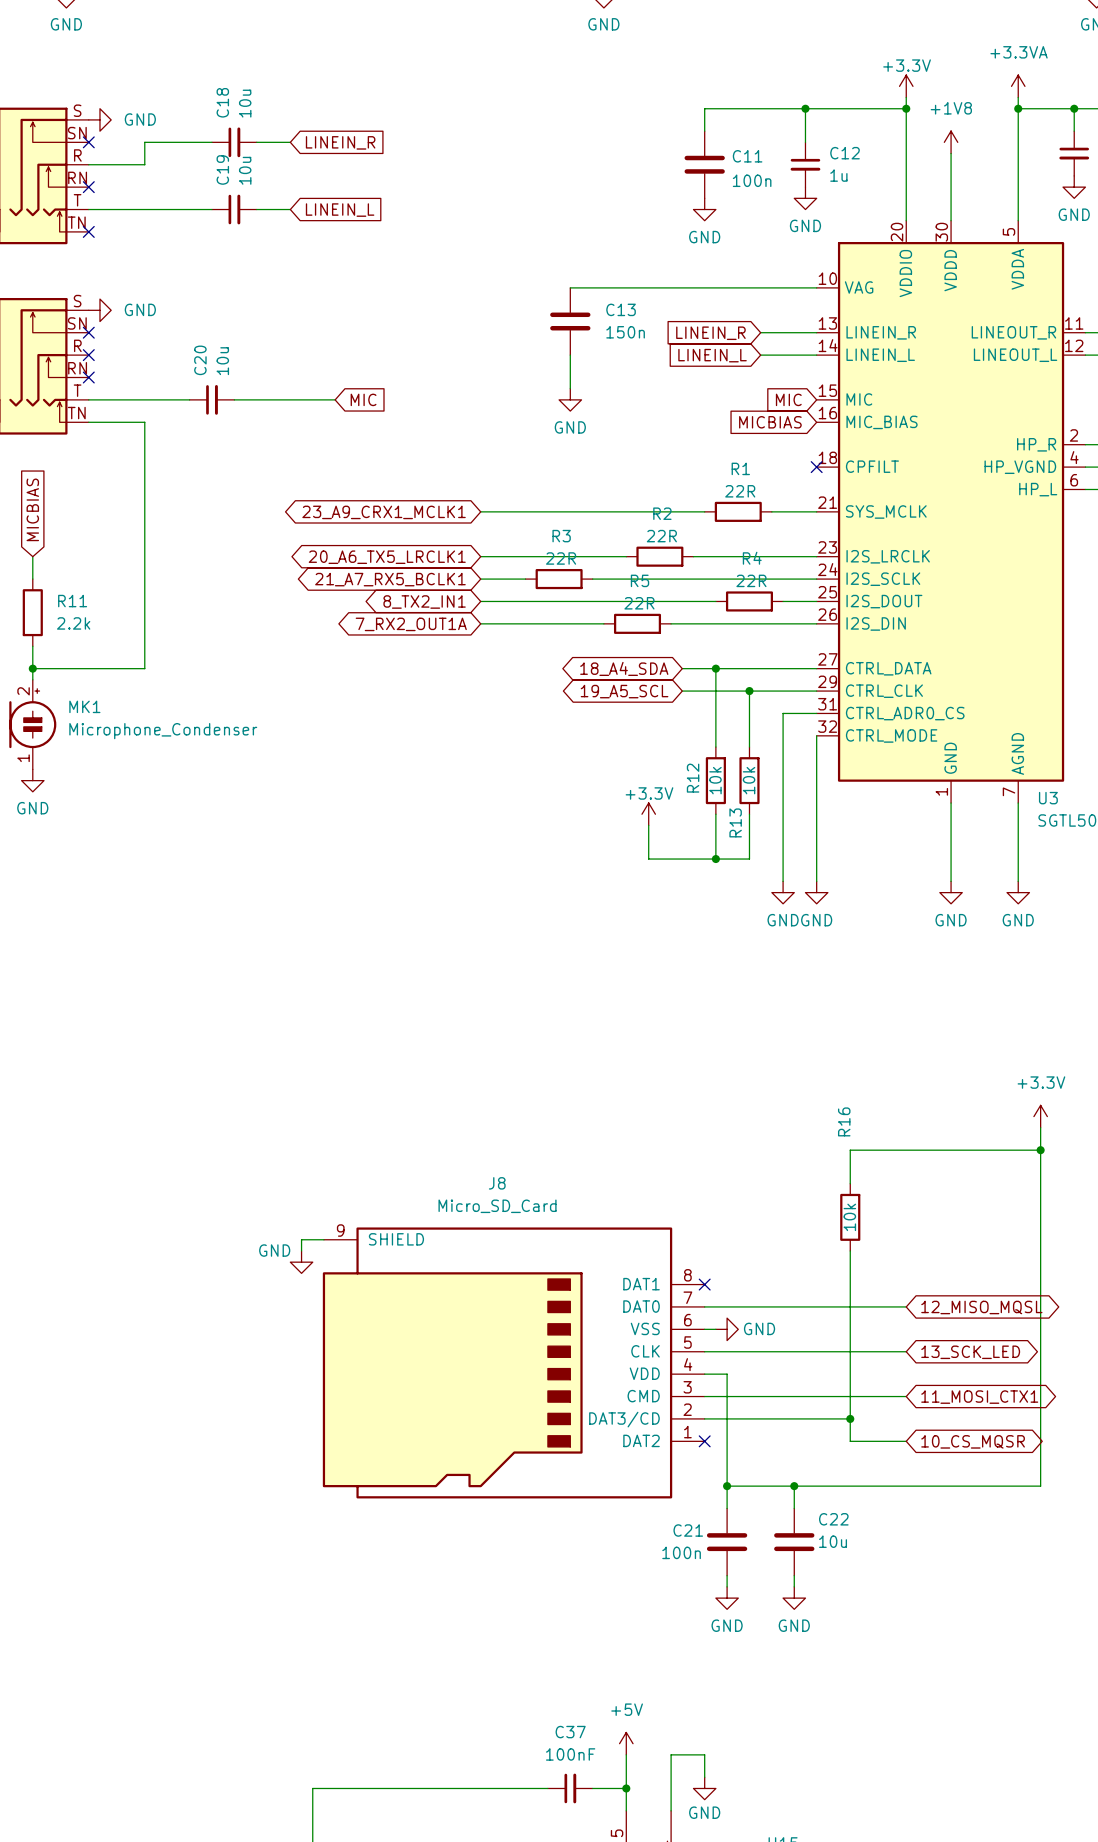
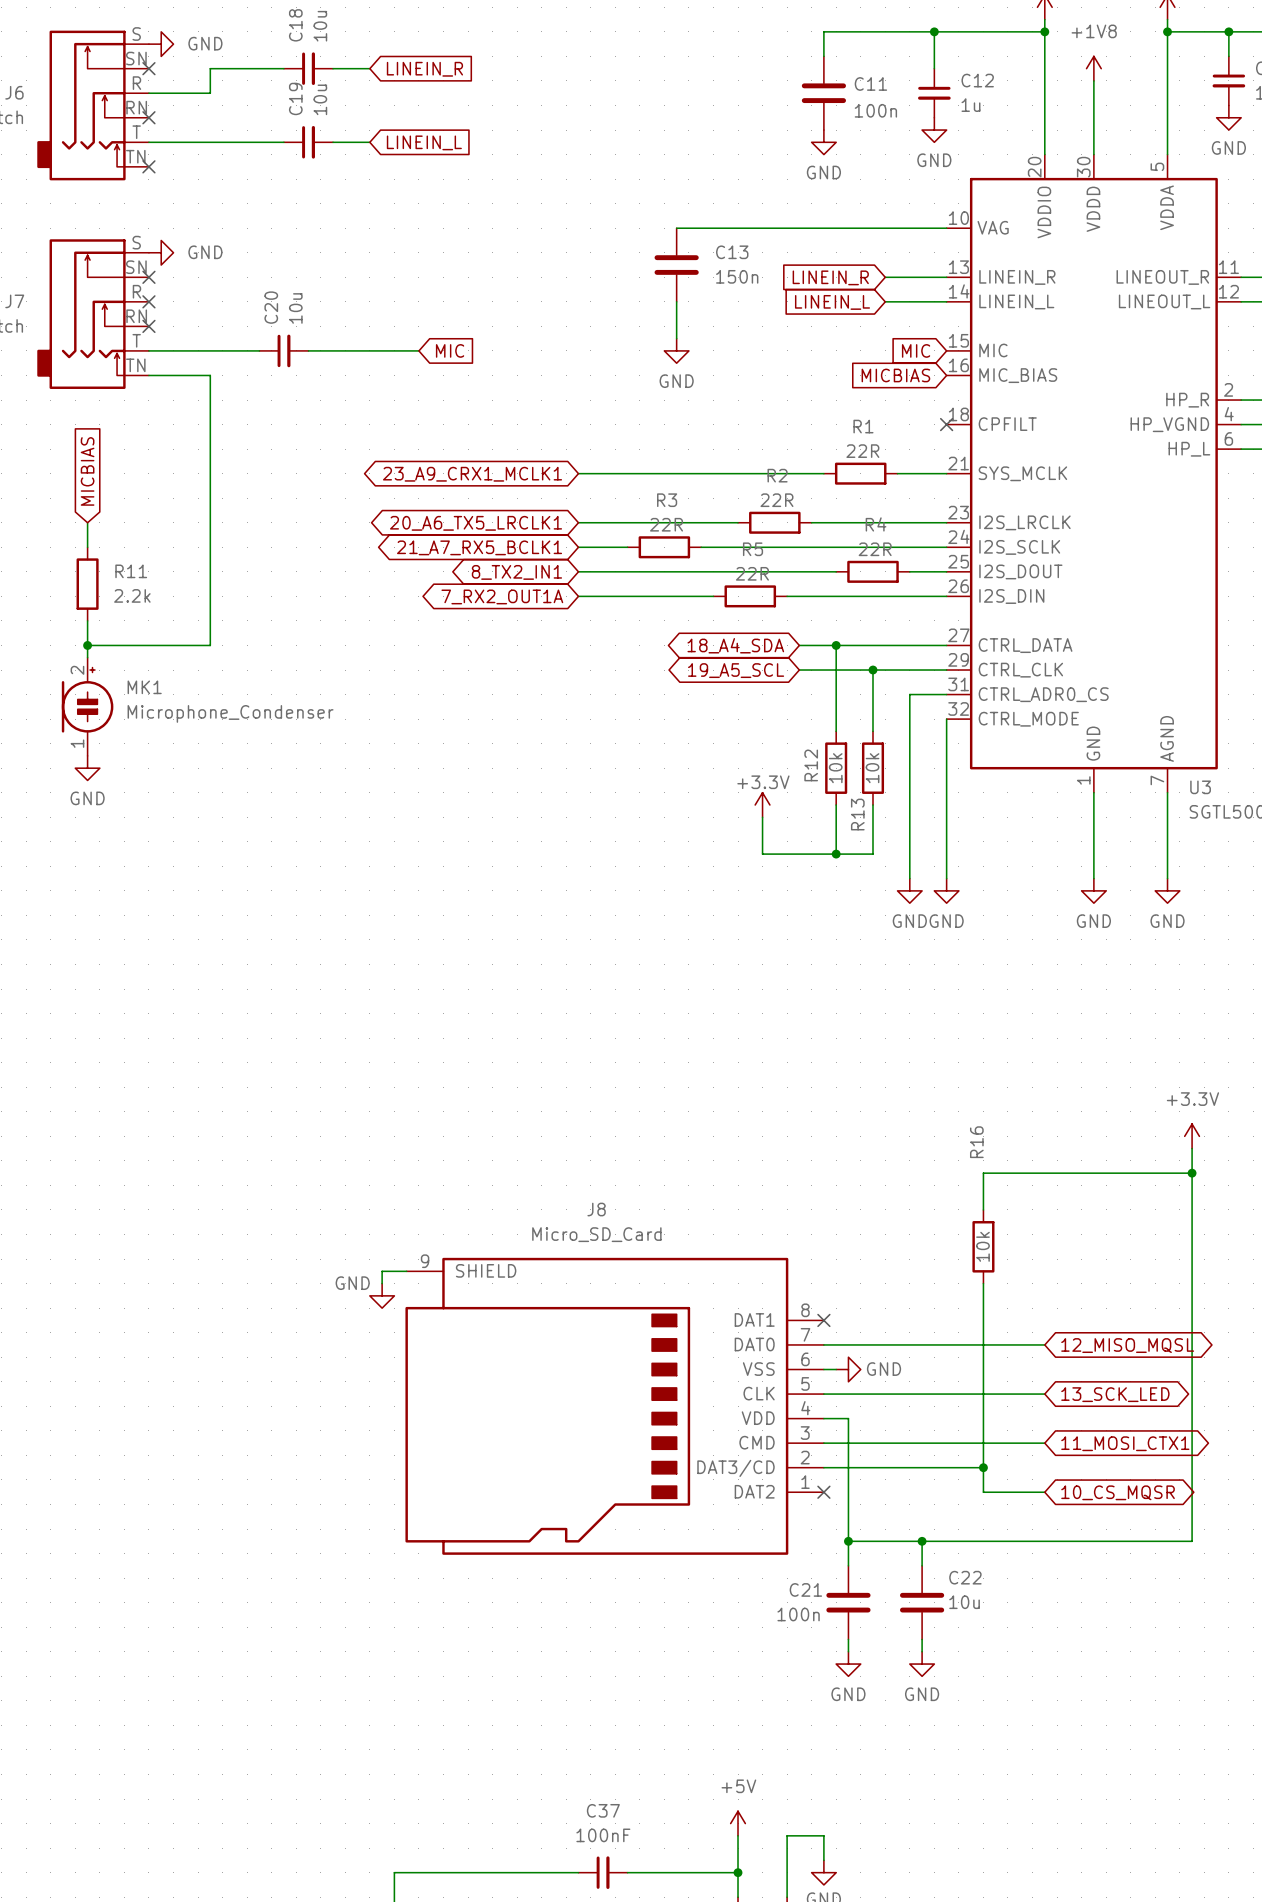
C37 position: (570, 1788) -> (603, 1872)

